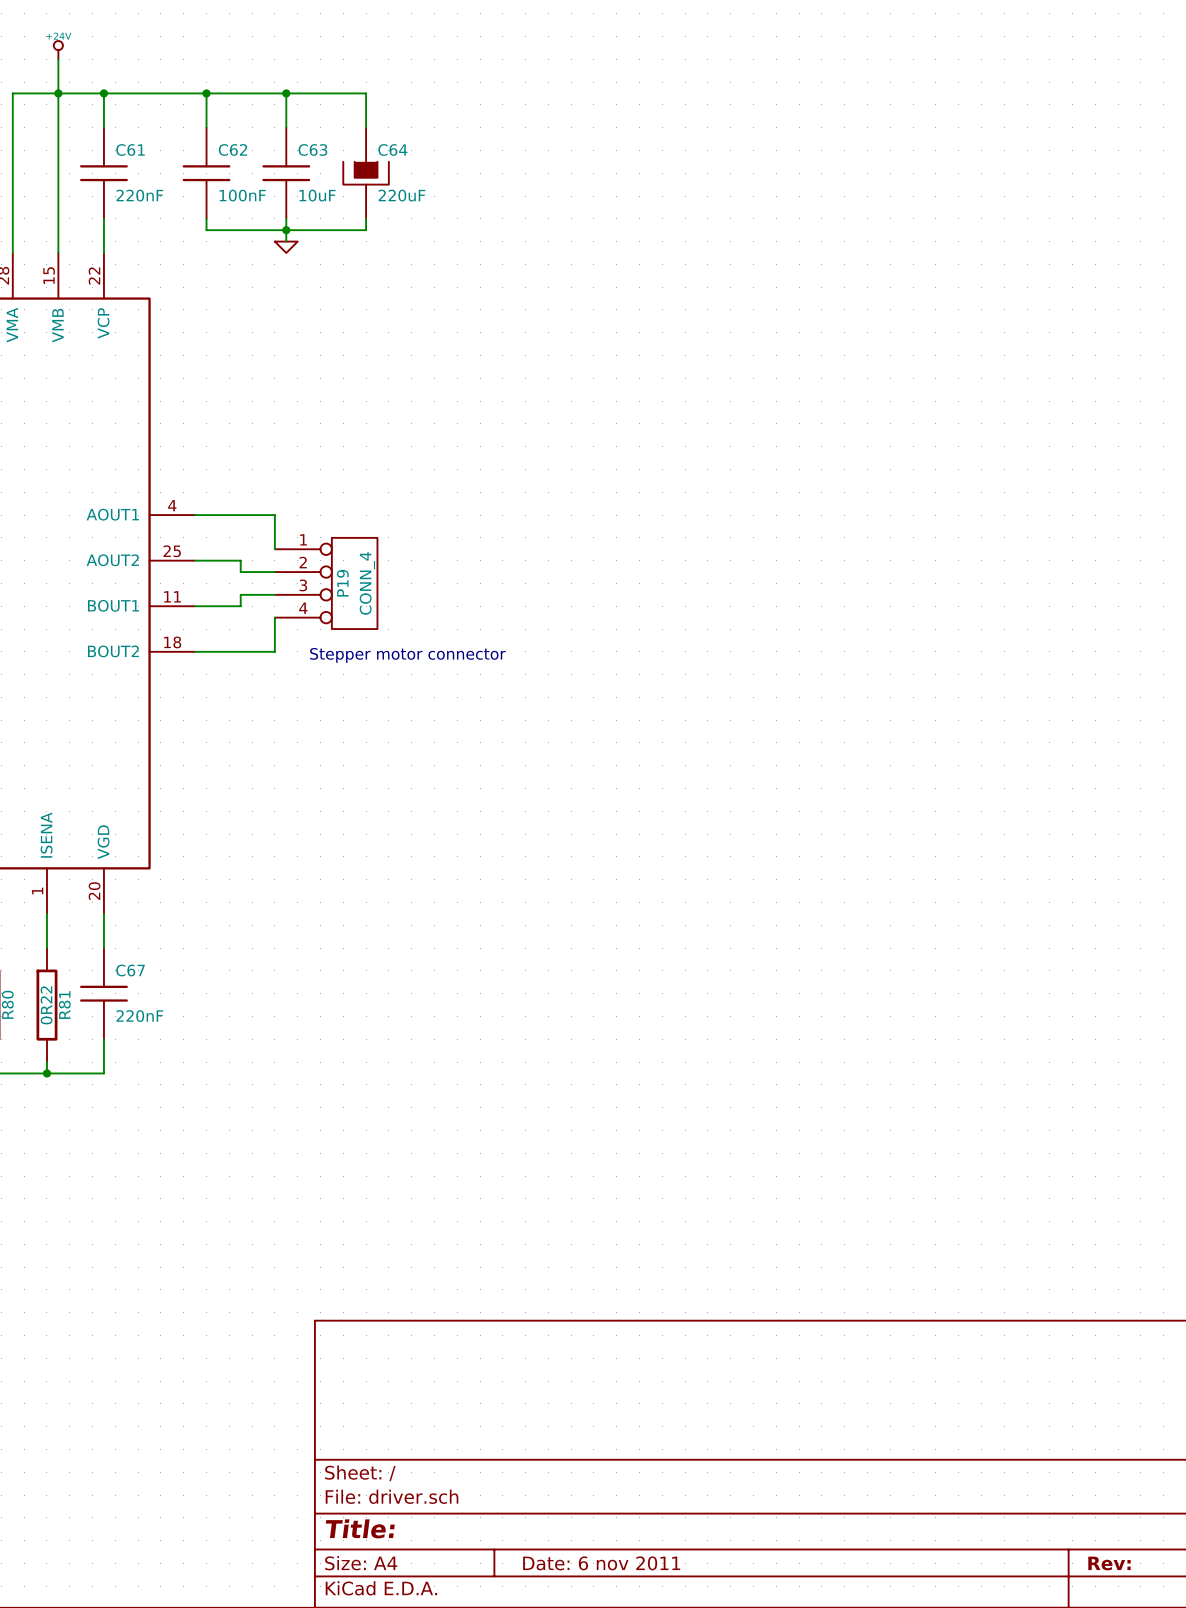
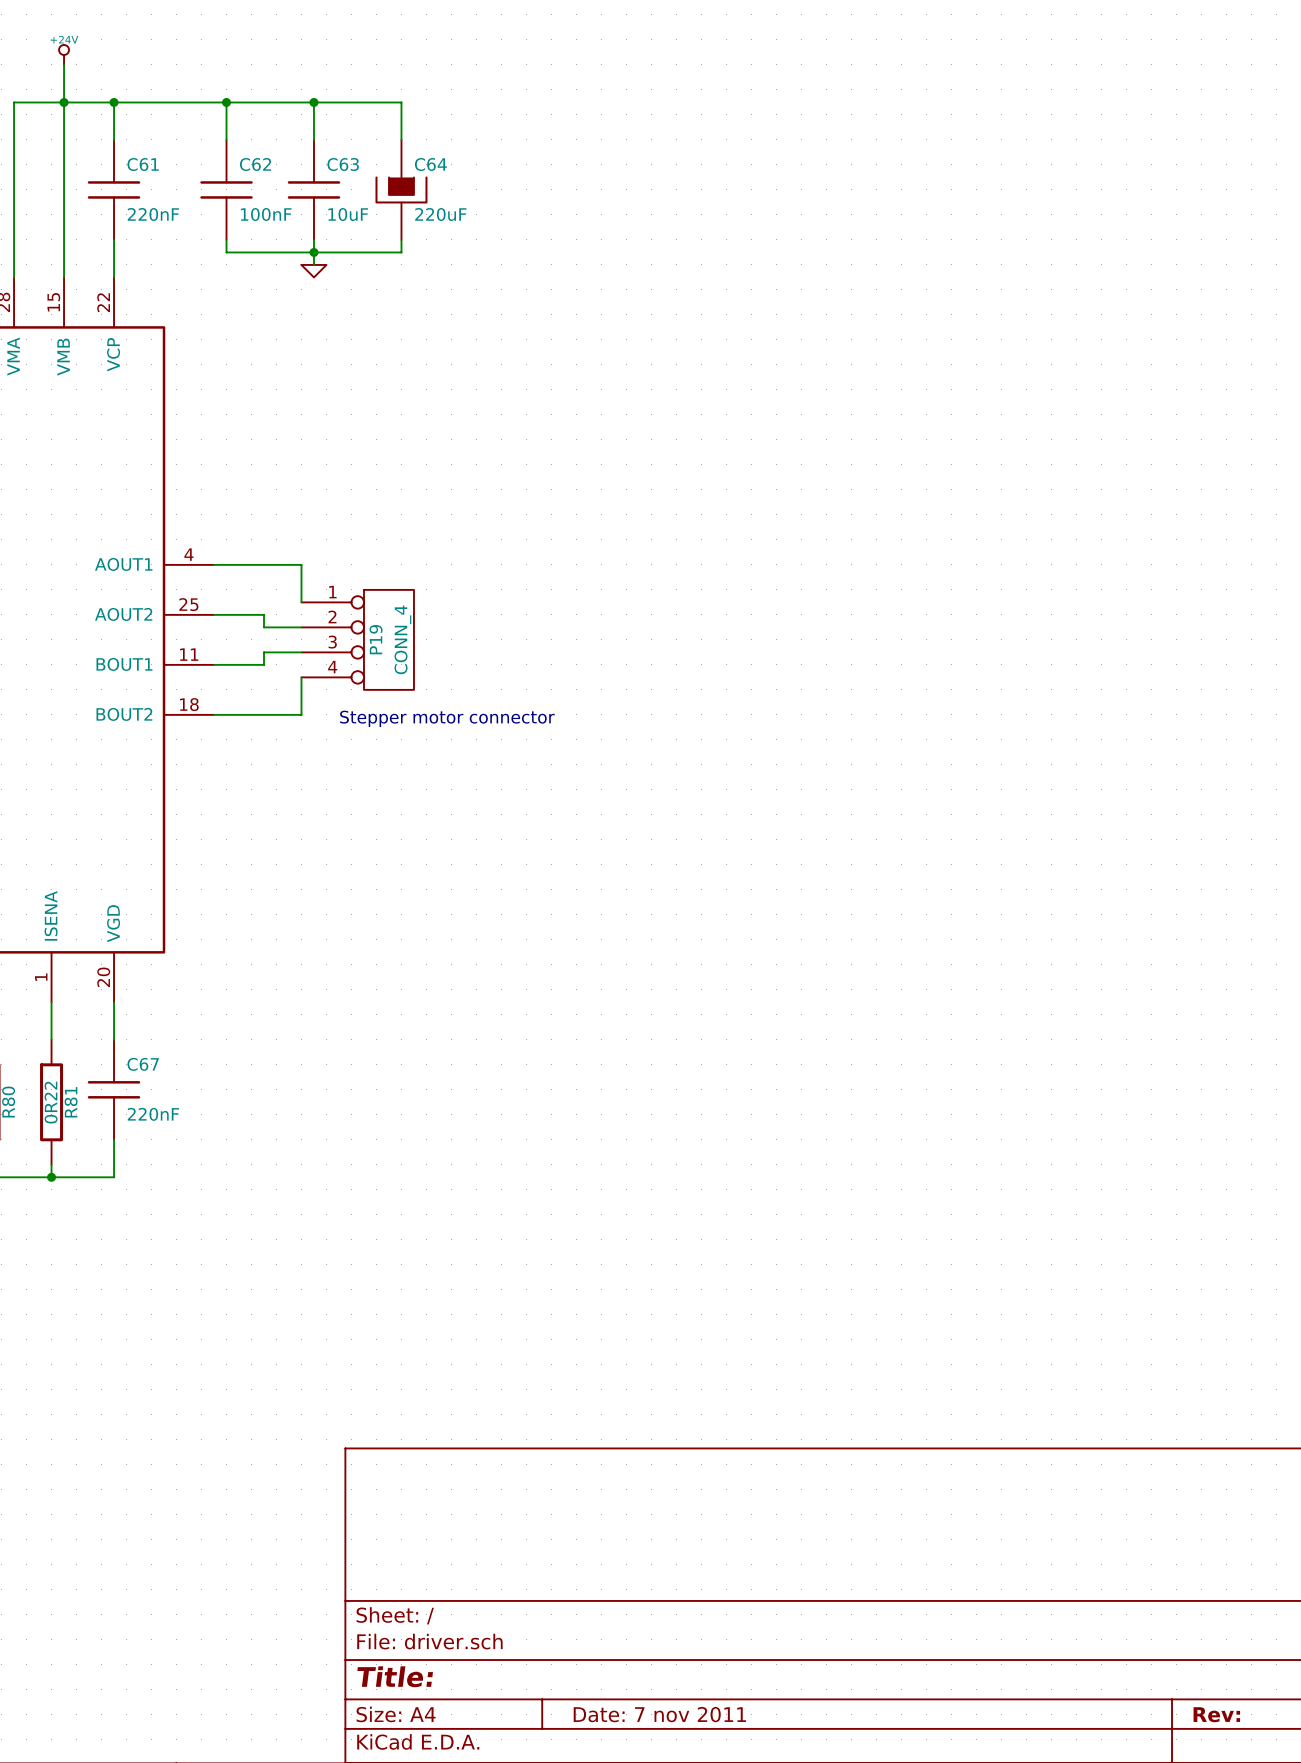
title block: Date: 6 nov 2011 (601, 1563) -> Date: 7 nov 2011 (659, 1714)

